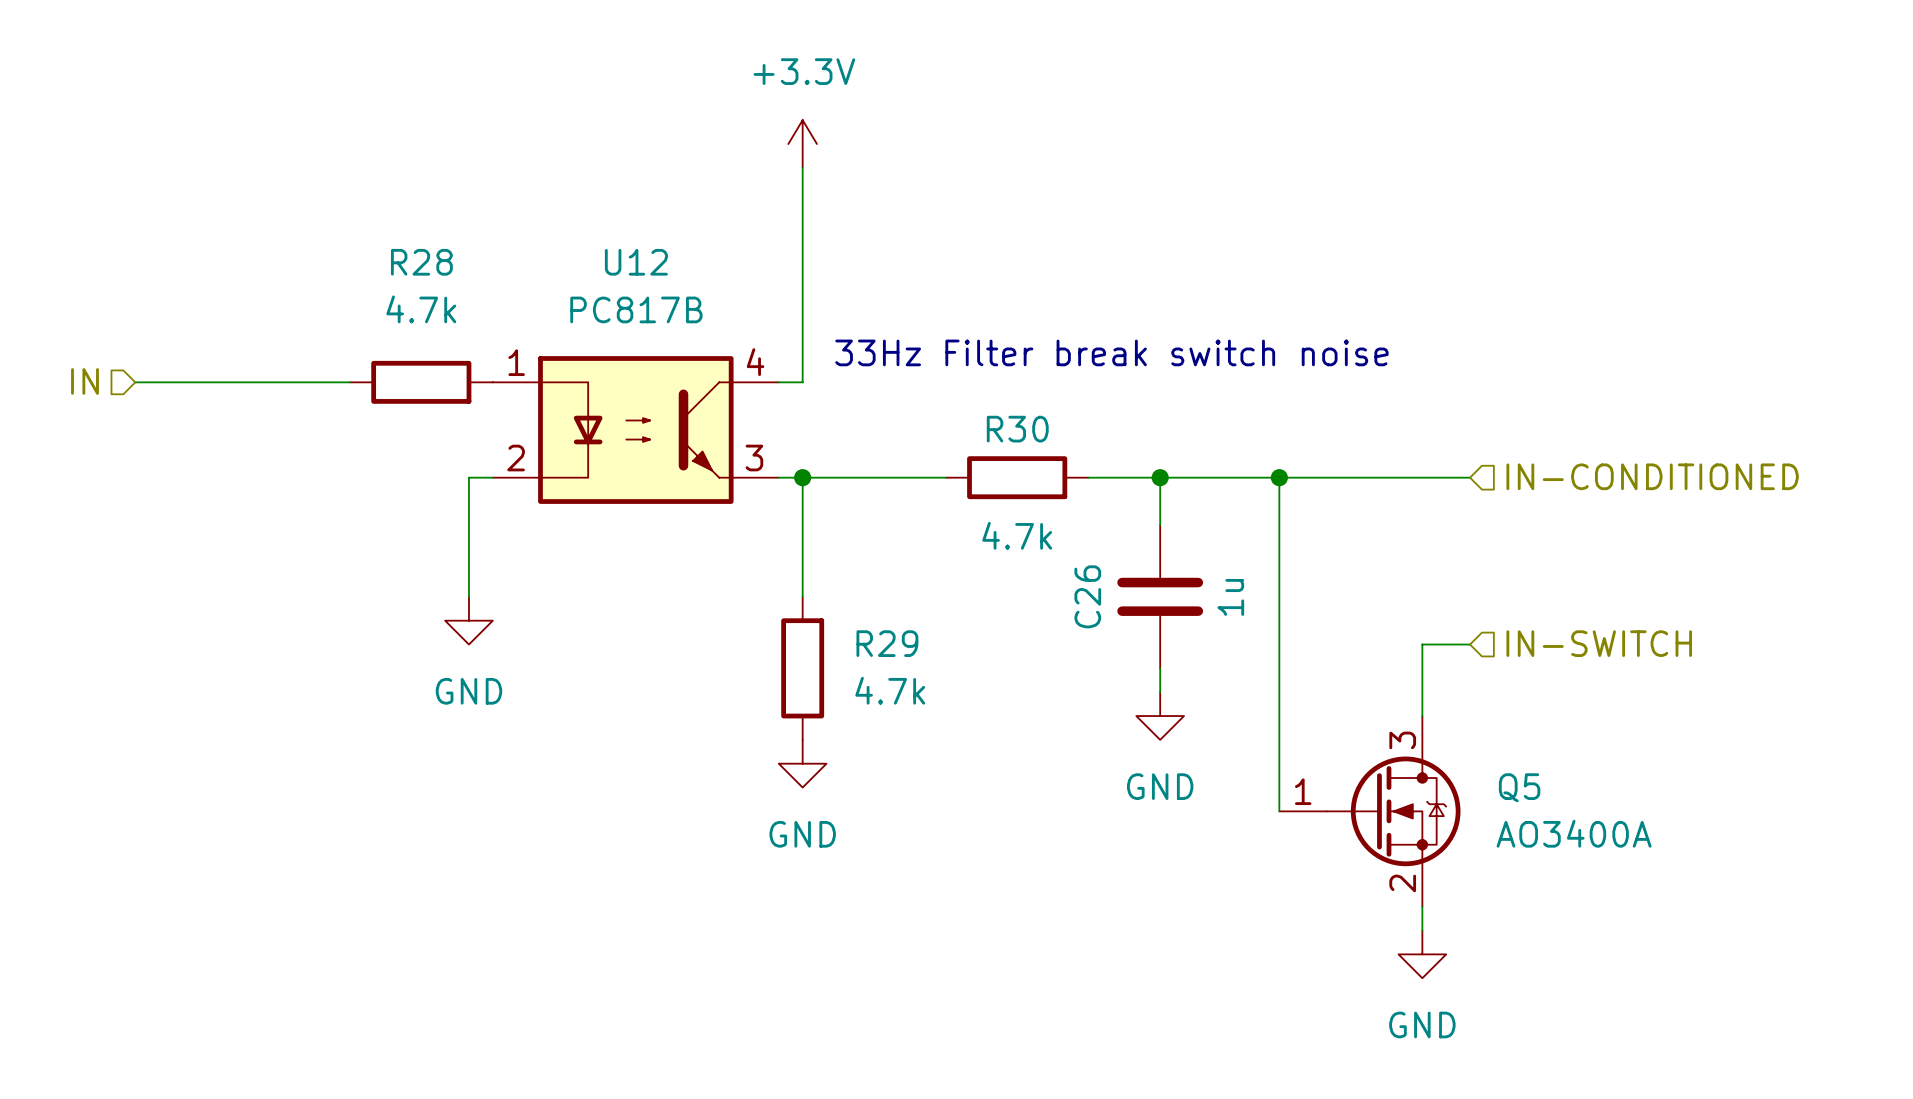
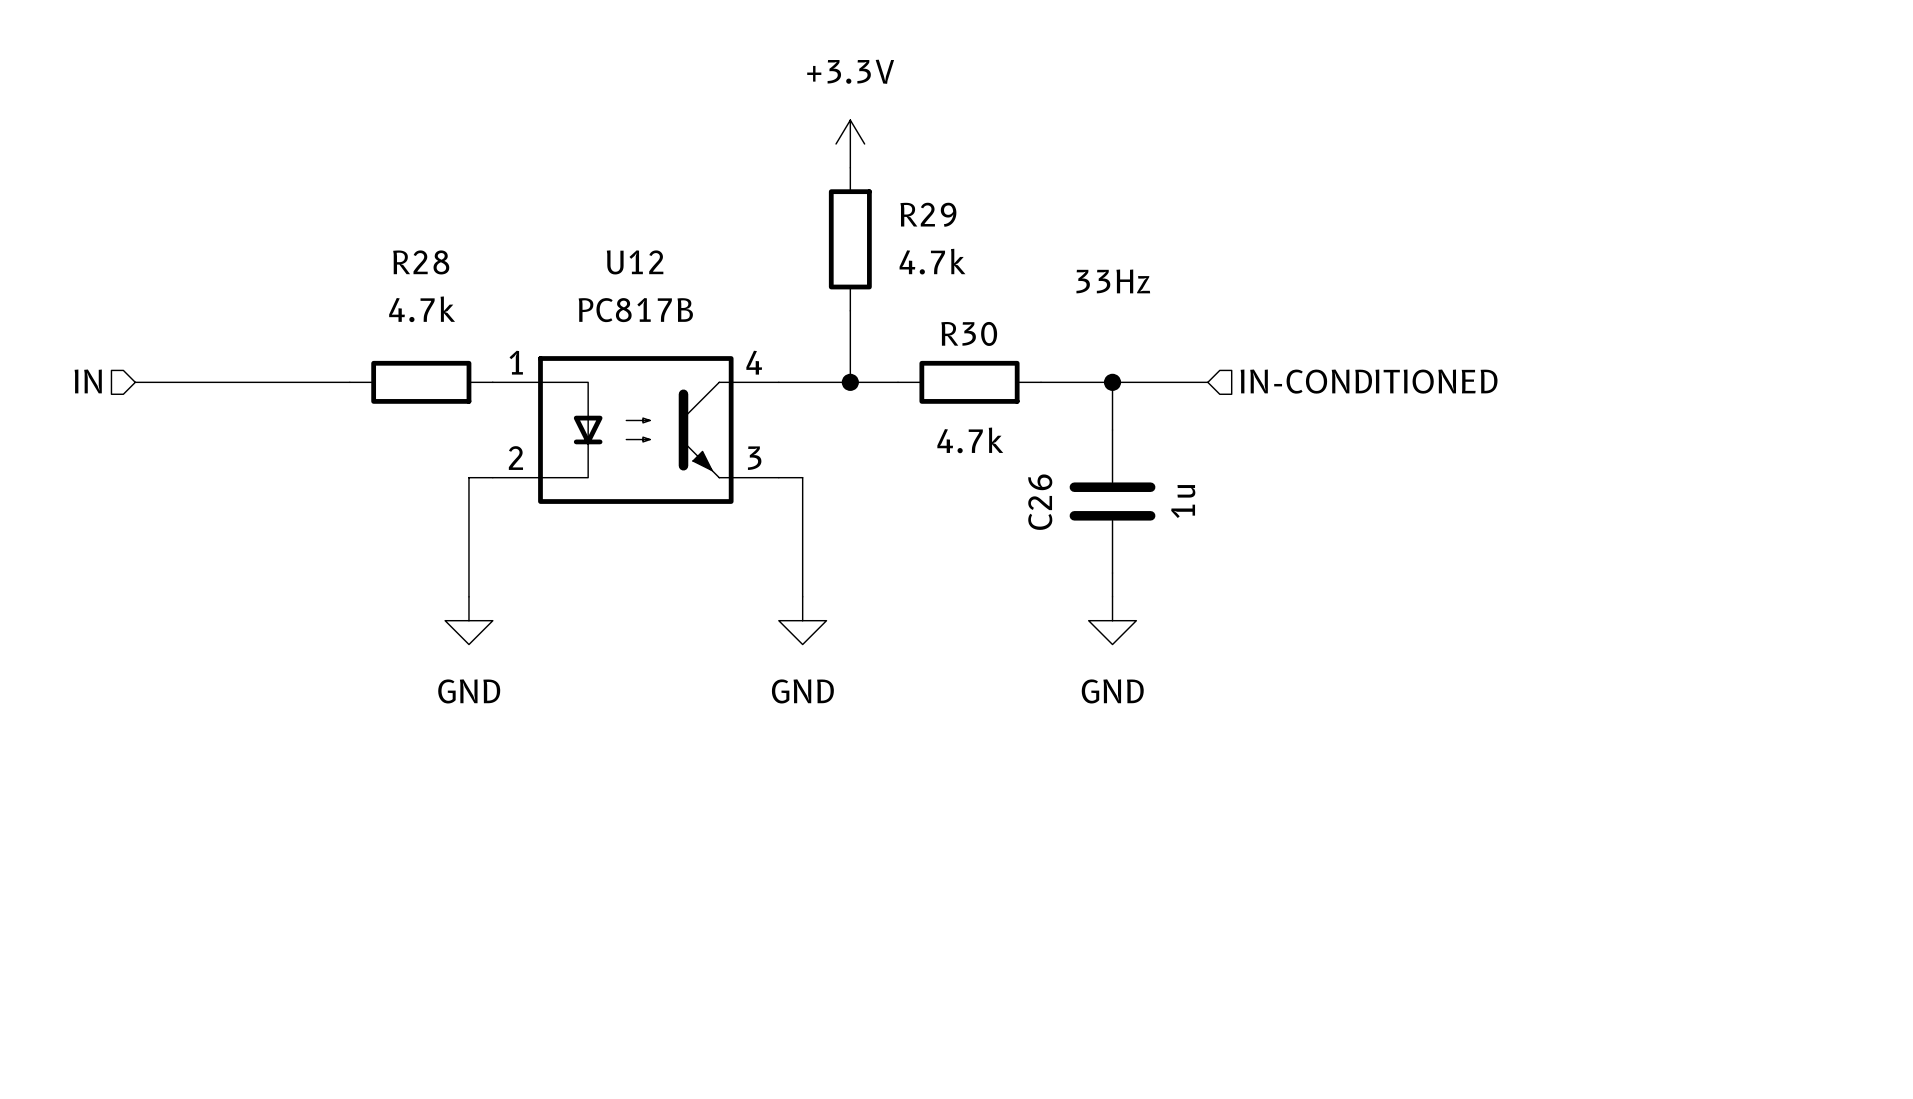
power symbol position: +3.3V (802, 143) -> +3.3V (850, 143)
wire: (802, 167) (802, 382) -> (898, 382) (802, 382)
text: none -> 33Hz (1113, 281)
wire: none -> (850, 310) (850, 382)
text: 33Hz Filter break switch noise (1111, 352) -> none
wire: none -> (1041, 382) (1207, 382)
junction: none -> (1112, 382)
hierarchical label position: IN-CONDITIONED (1652, 476) -> IN-CONDITIONED (1369, 381)
wire: (802, 477) (945, 477) -> none
junction position: (802, 477) -> (850, 382)
R30 position: (1017, 477) -> (969, 382)
wire: (1088, 477) (1470, 477) -> none
wire: (1160, 477) (1160, 525) -> (1112, 382) (1112, 430)
junction: (1160, 477) -> none
wire: (1279, 477) (1279, 811) -> none
junction: (1279, 477) -> none
C26 position: (1160, 596) -> (1112, 501)
hierarchical label: IN-SWITCH (1599, 643) -> none
wire: (1470, 644) (1422, 644) (1422, 716) -> none
R29 position: (802, 668) -> (850, 239)
wire: (1160, 668) (1160, 692) -> (1112, 573) (1112, 596)
power symbol position: GND (1160, 716) -> GND (1112, 620)
power symbol position: GND (802, 763) -> GND (802, 620)
Q5: AO3400A (1369, 811) -> none
wire: (1422, 906) (1422, 930) -> none
power symbol: GND (1422, 954) -> none

